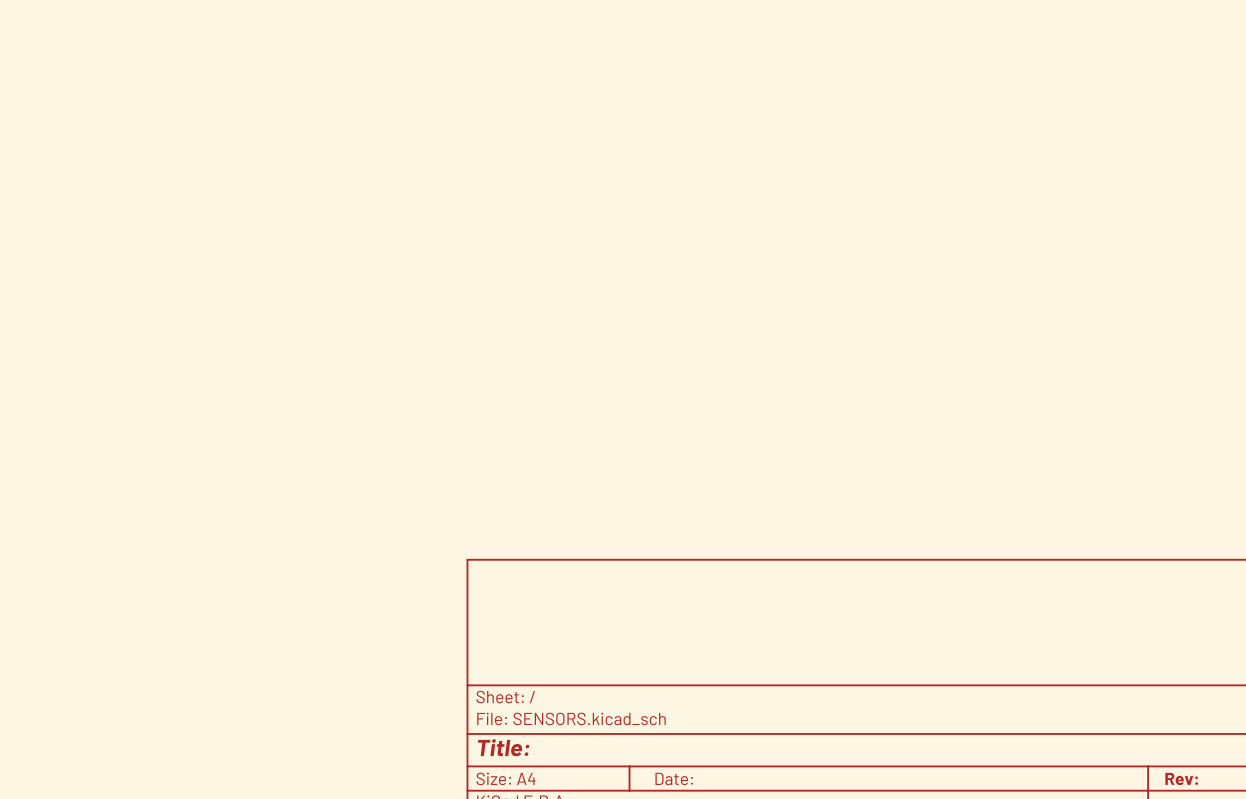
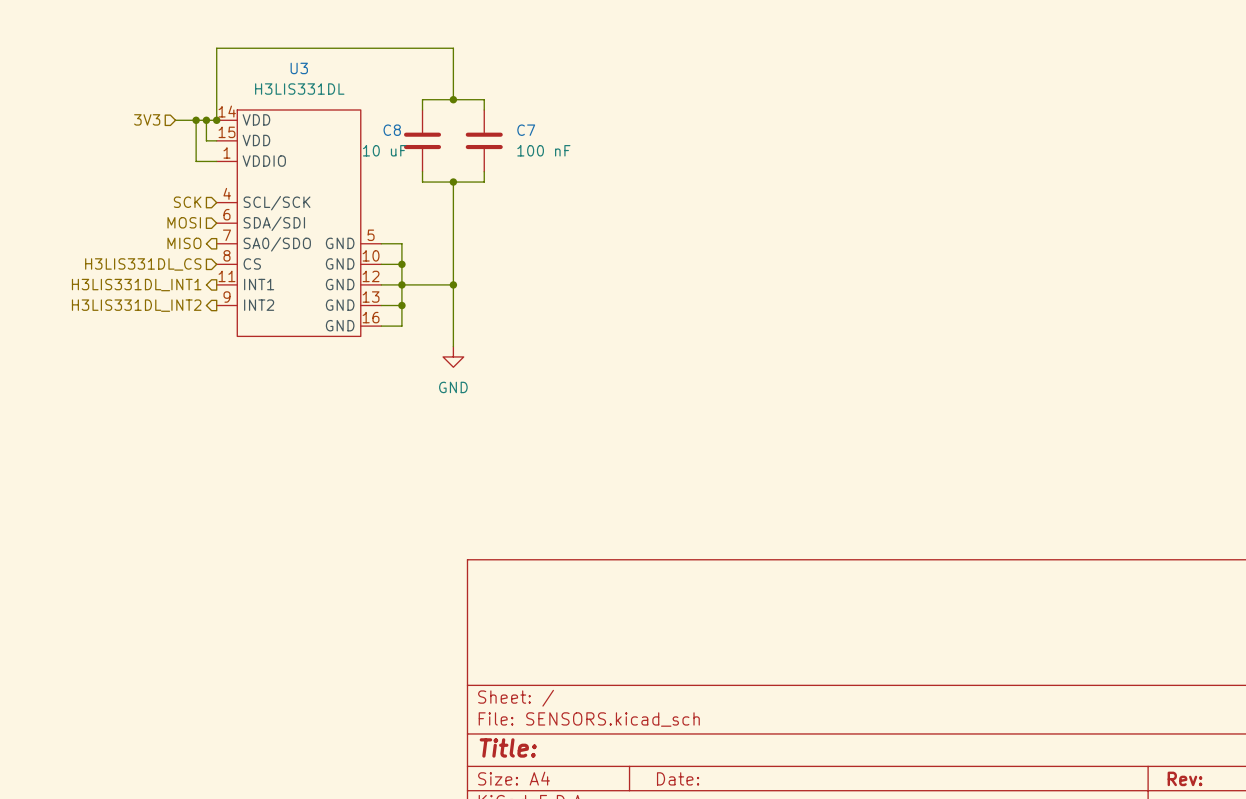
wire: none -> (453, 99) (453, 48) (216, 48) (216, 120) (175, 120)
junction: none -> (453, 99)
wire: none -> (422, 109) (422, 99) (484, 99) (484, 109)
hierarchical label: none -> 3V3 (147, 119)
wire: none -> (196, 120) (196, 161) (216, 161)
junction: none -> (196, 120)
wire: none -> (206, 120) (206, 140) (216, 140)
junction: none -> (206, 120)
junction: none -> (216, 120)
C8: none -> 10 uF (422, 140)
C7: none -> 100 nF (484, 140)
wire: none -> (422, 171) (422, 182) (484, 182) (484, 171)
wire: none -> (453, 182) (453, 346)
junction: none -> (453, 182)
hierarchical label: none -> SCK (187, 202)
hierarchical label: none -> MOSI (184, 222)
U3: none -> H3LIS331DL (299, 223)
hierarchical label: none -> MISO (184, 243)
wire: none -> (381, 243) (401, 243) (401, 326) (381, 326)
hierarchical label: none -> H3LIS331DL_CS (143, 264)
wire: none -> (381, 264) (401, 264)
junction: none -> (401, 264)
hierarchical label: none -> H3LIS331DL_INT1 (136, 285)
wire: none -> (381, 284) (453, 284)
junction: none -> (401, 284)
junction: none -> (453, 284)
hierarchical label: none -> H3LIS331DL_INT2 (136, 305)
wire: none -> (381, 305) (401, 305)
junction: none -> (401, 305)
power symbol: none -> GND (453, 356)

